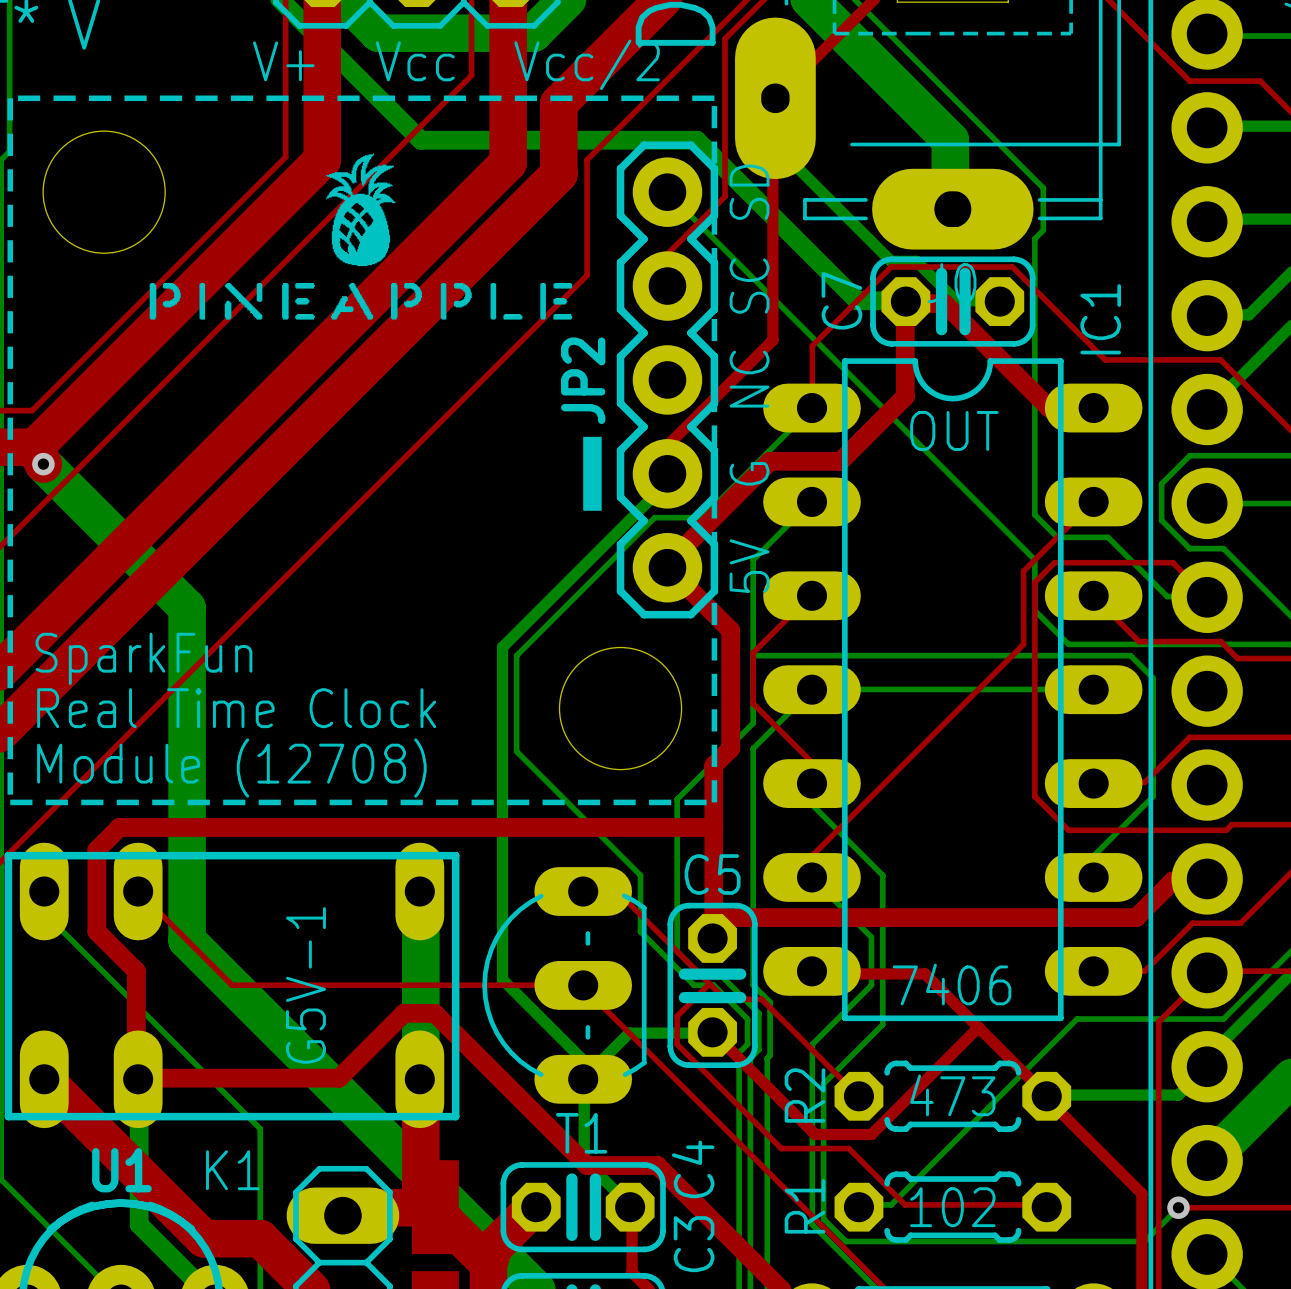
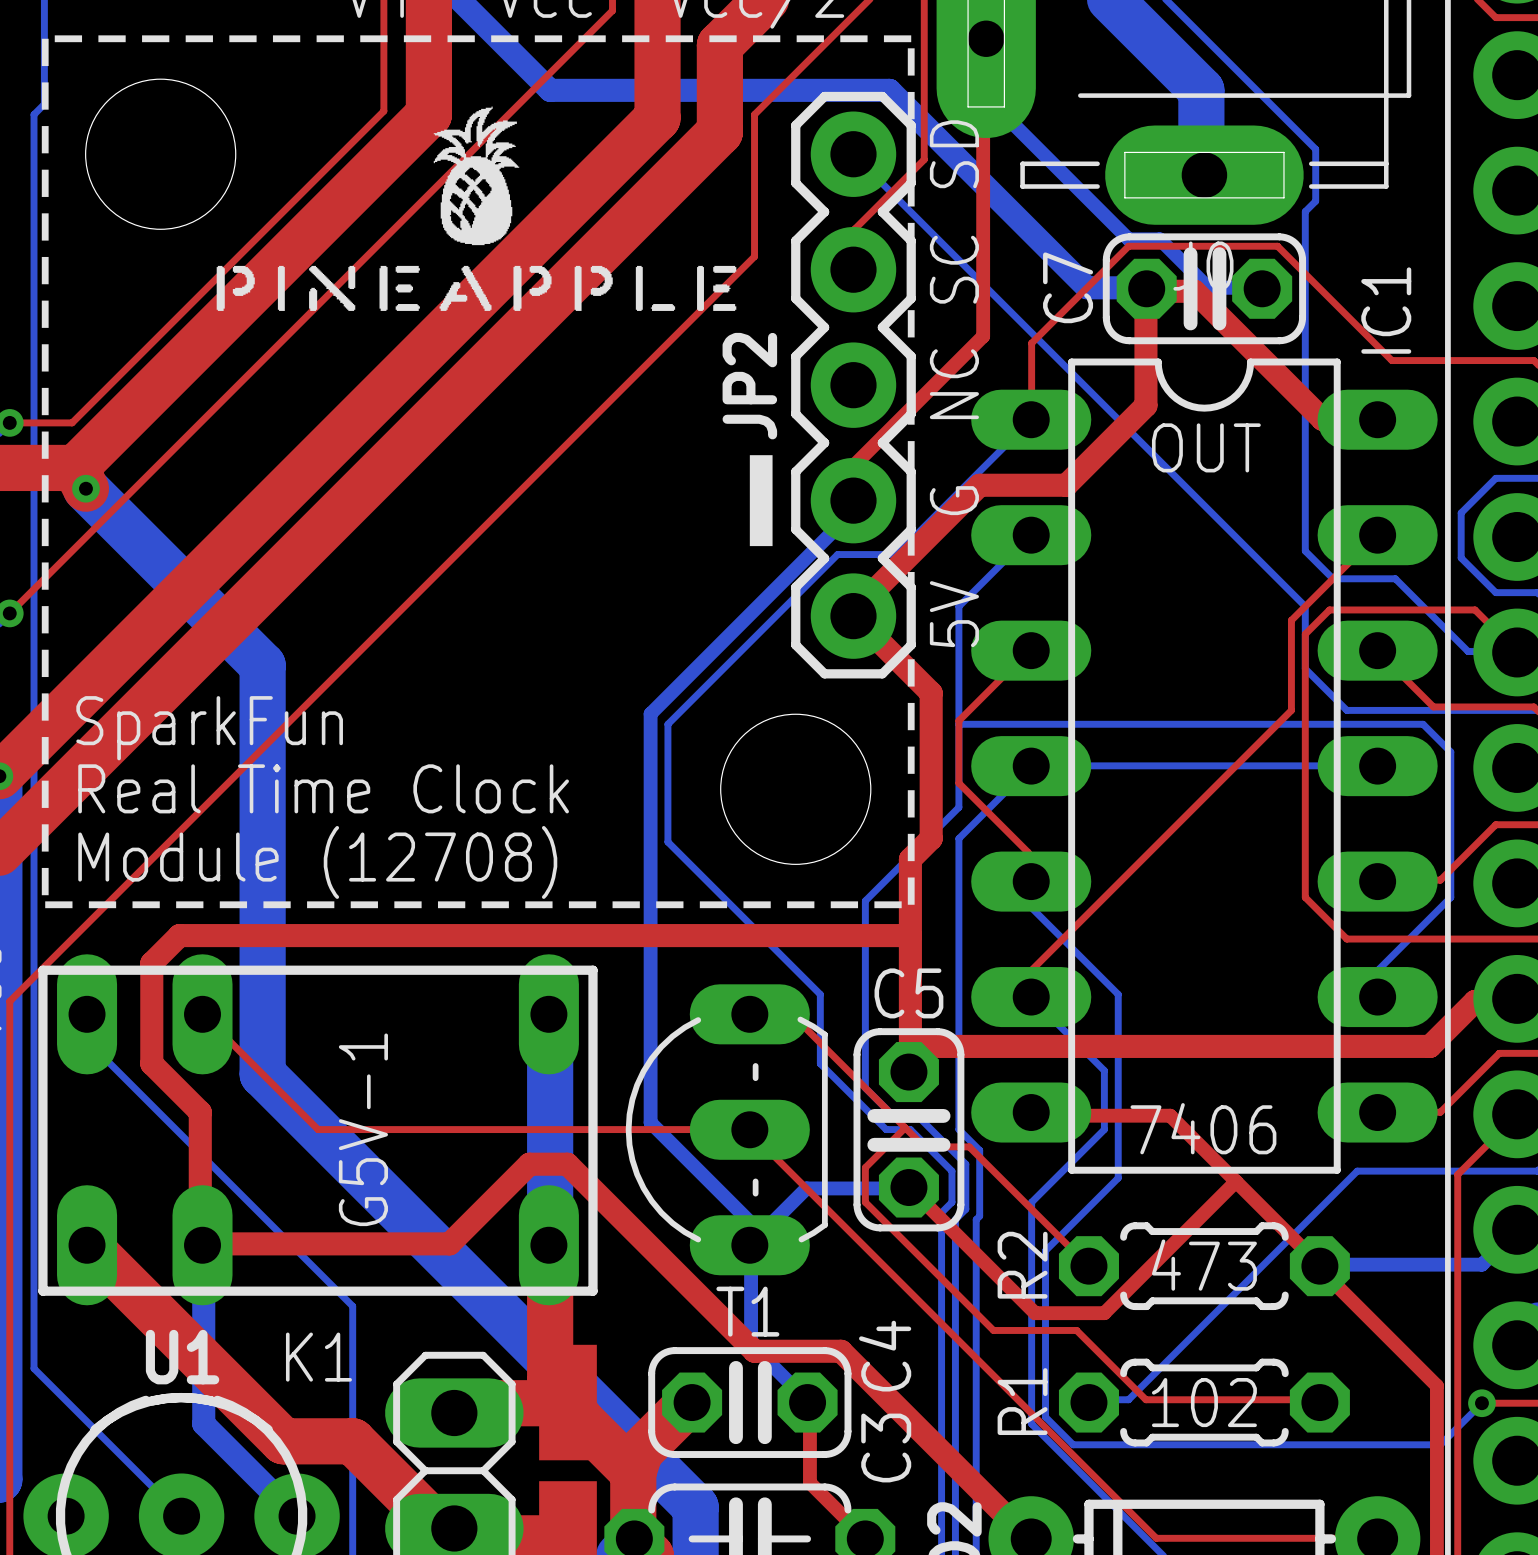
text position: G5V-1 (305, 985) -> G5V-1 (363, 1129)

